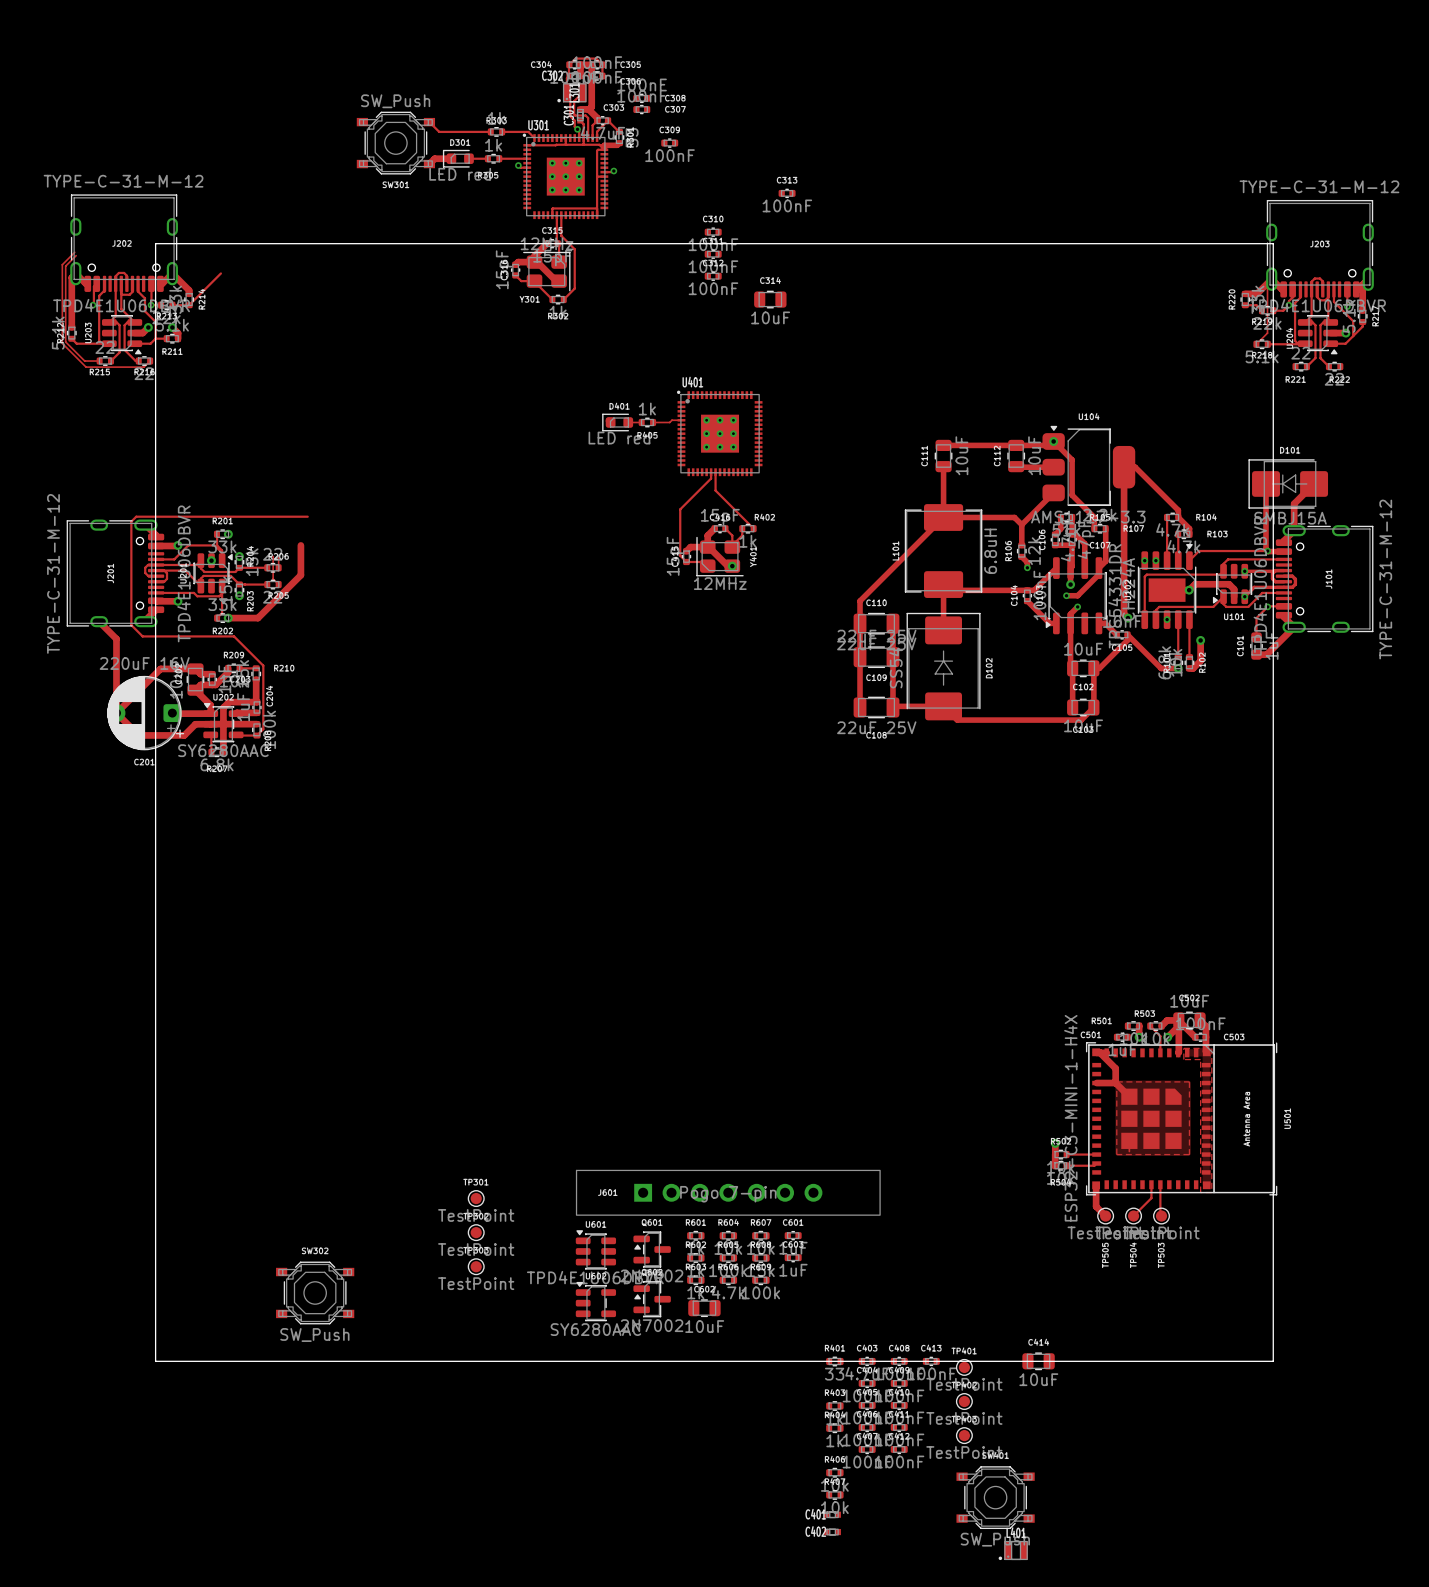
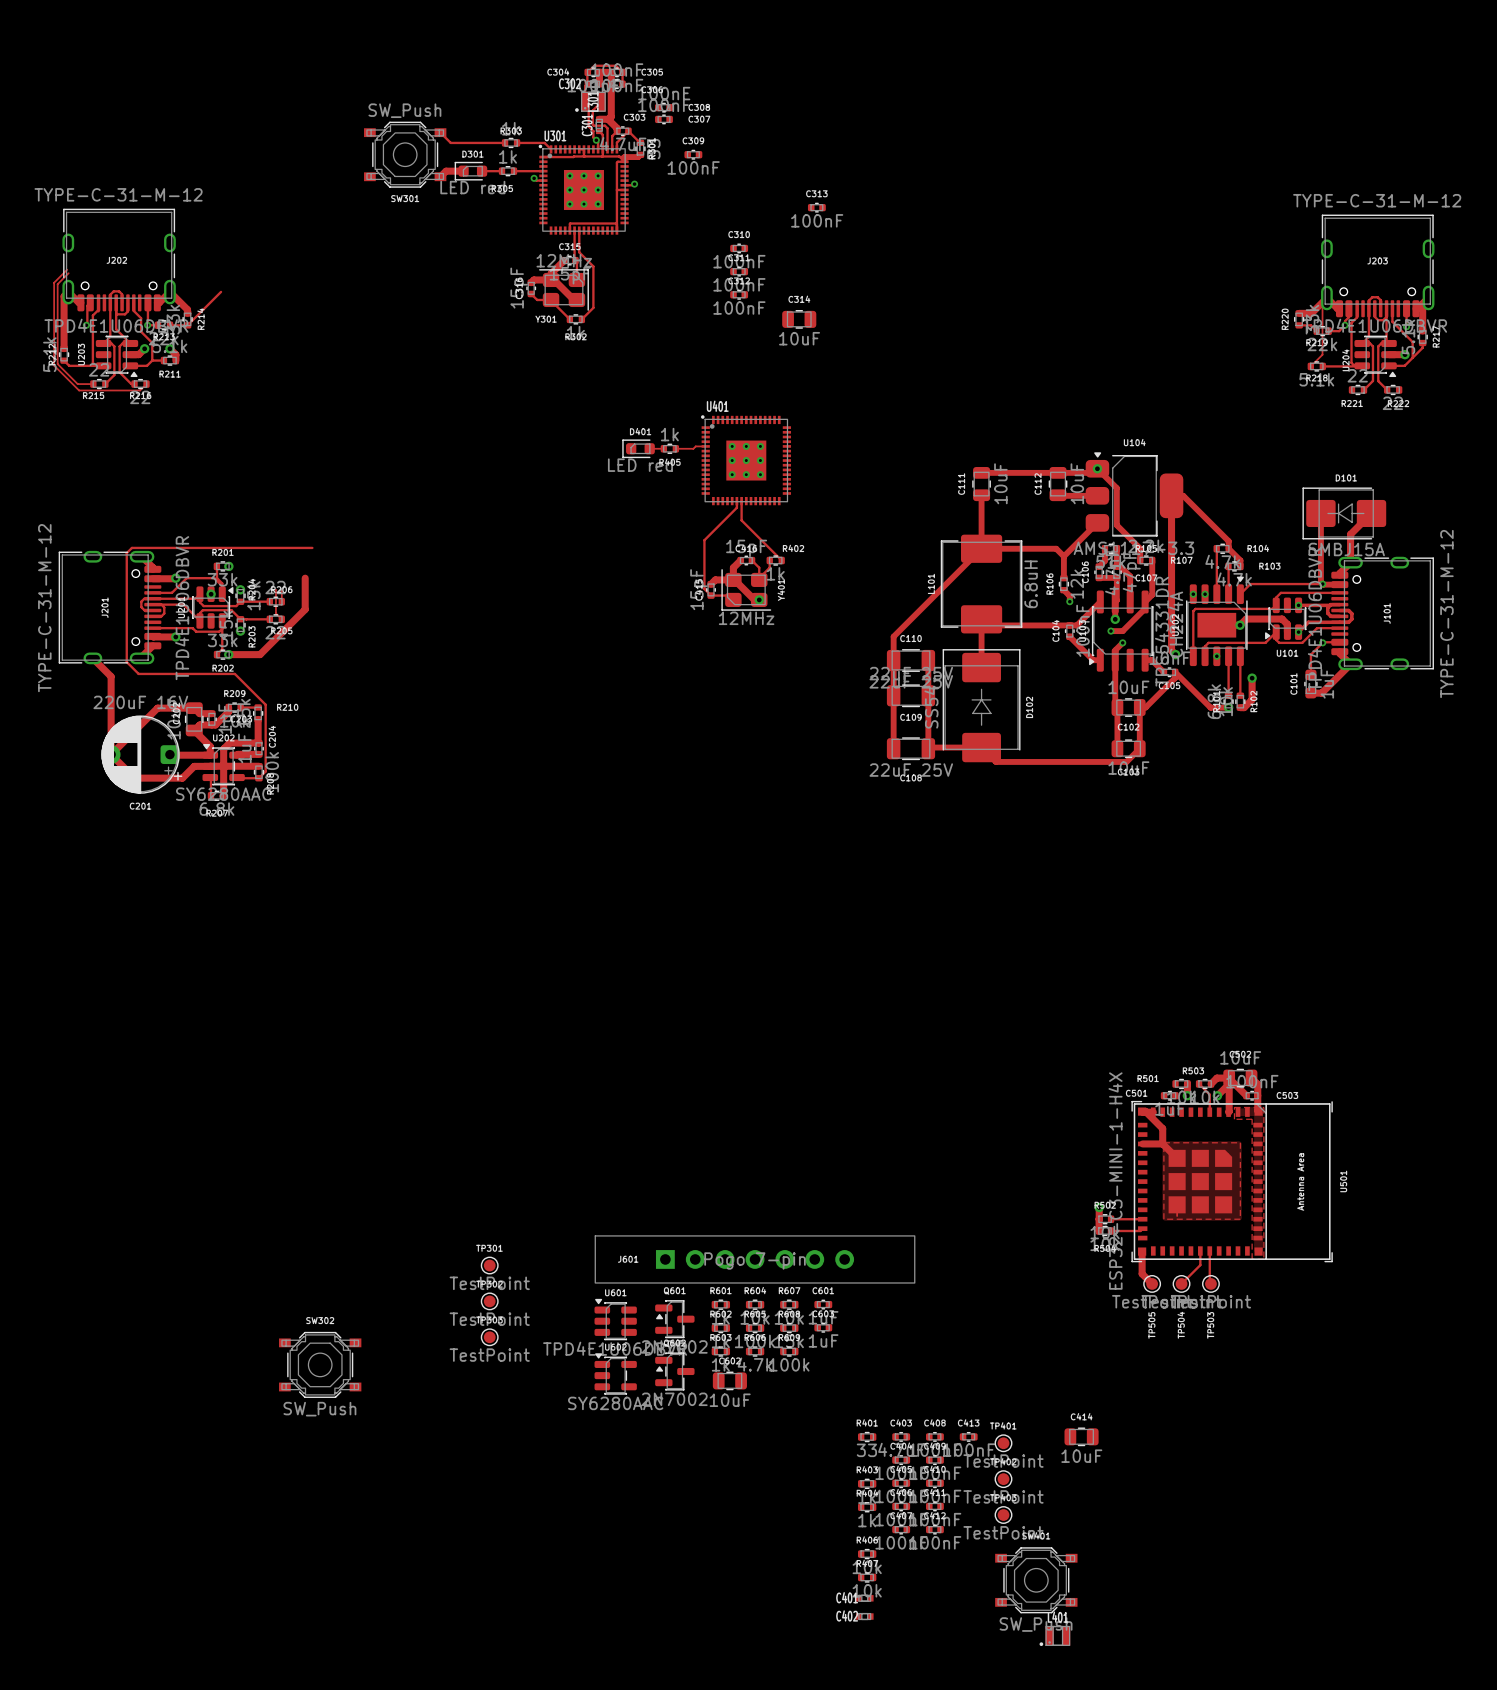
board edge: (155, 243) (1273, 243) (1273, 1361) (155, 1361) (155, 243) -> none

